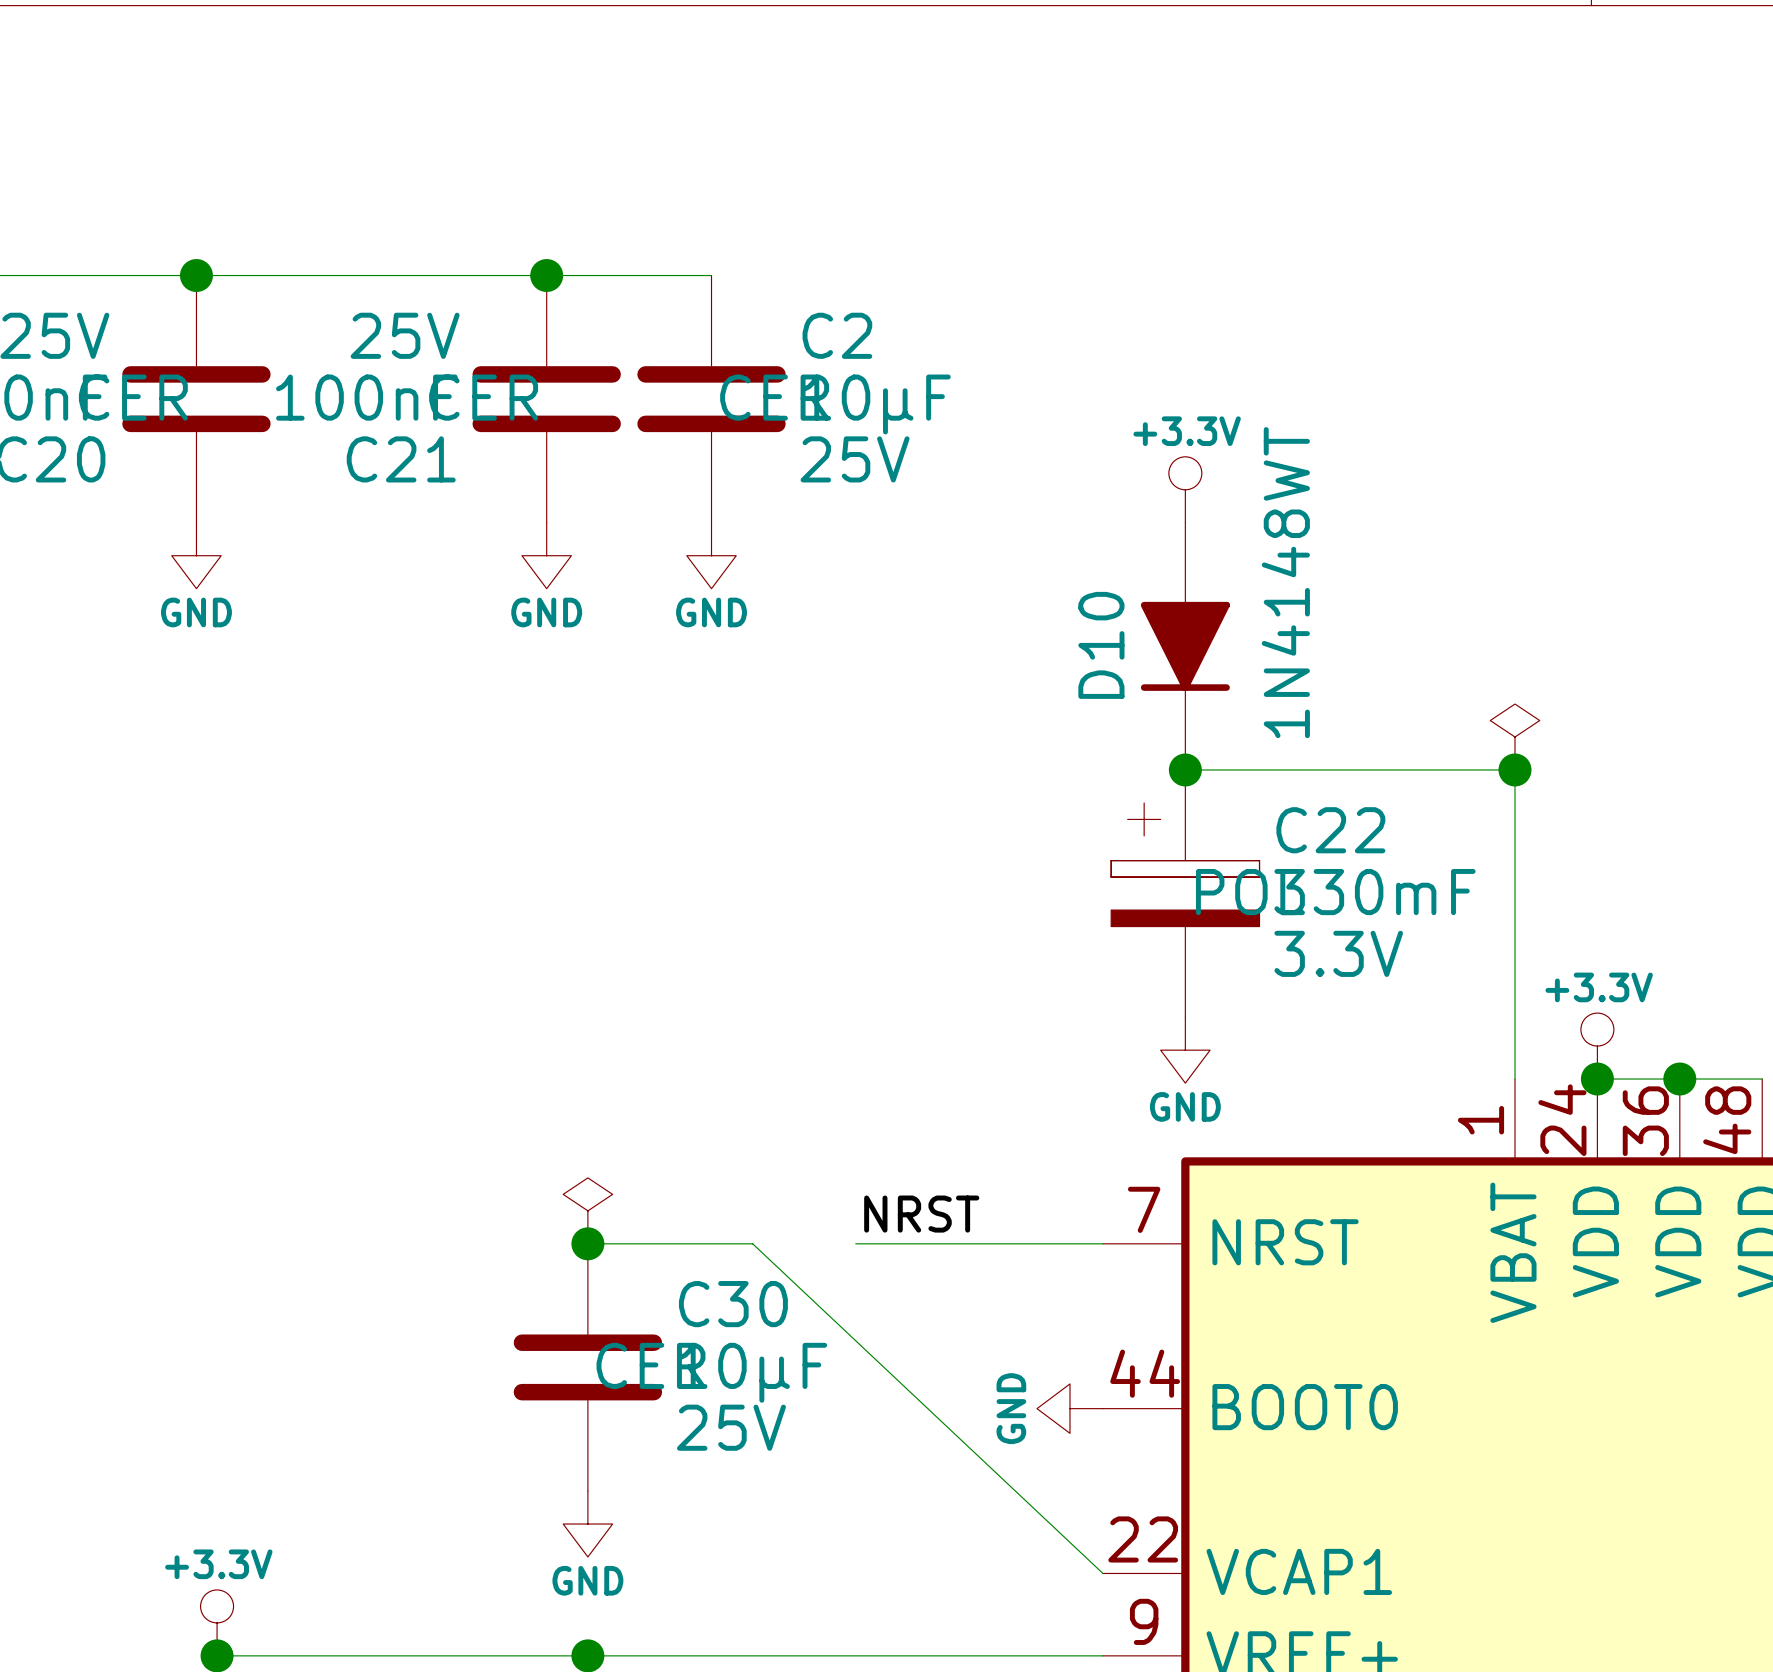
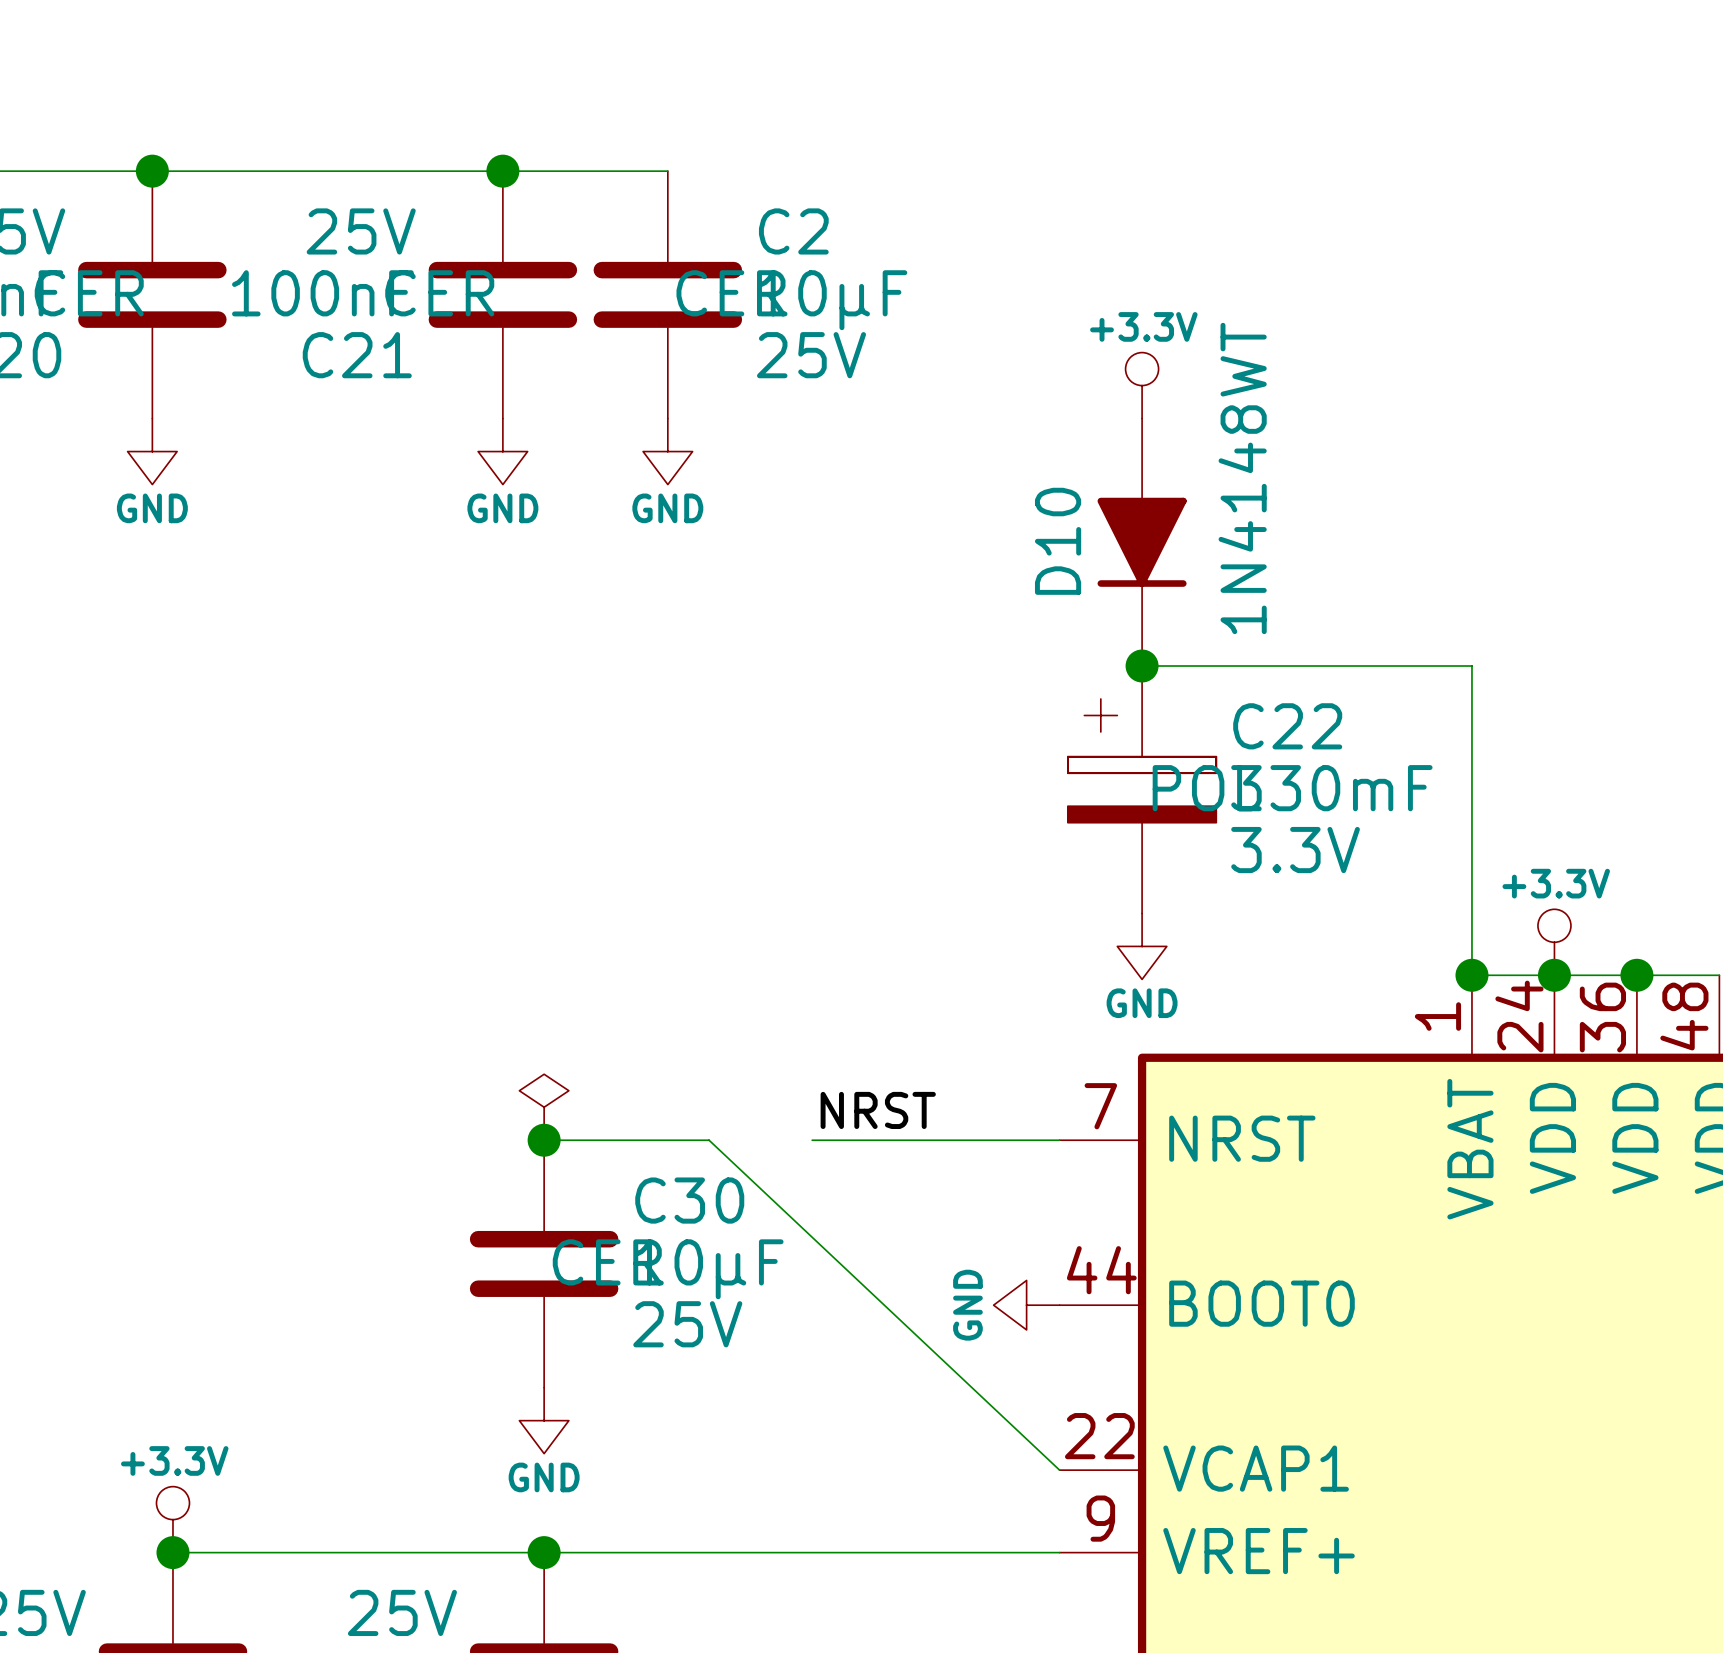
power symbol: (1514, 737) -> none
junction: (1514, 769) -> none
wire: none -> (1471, 975) (1554, 975)
junction: none -> (1471, 975)

